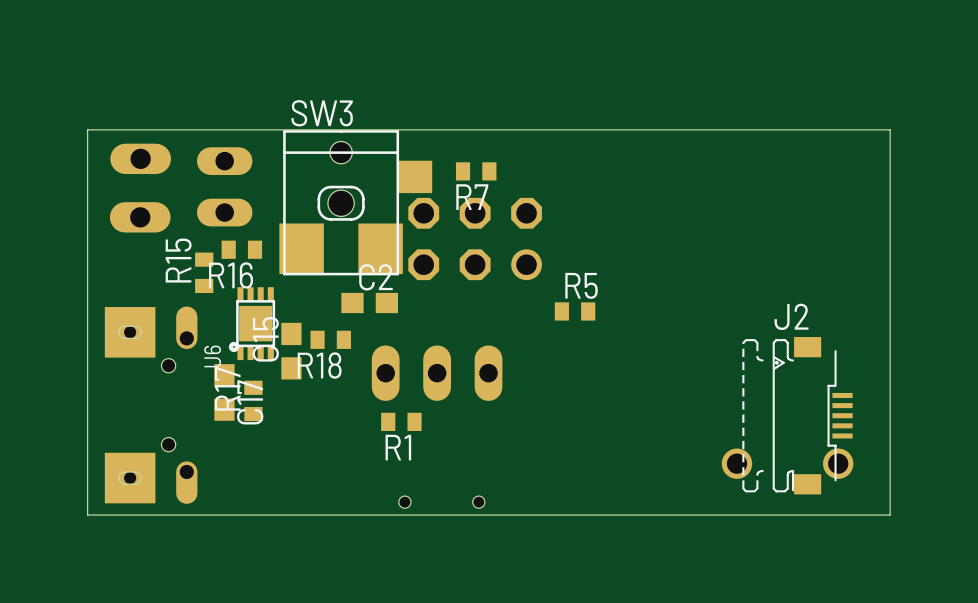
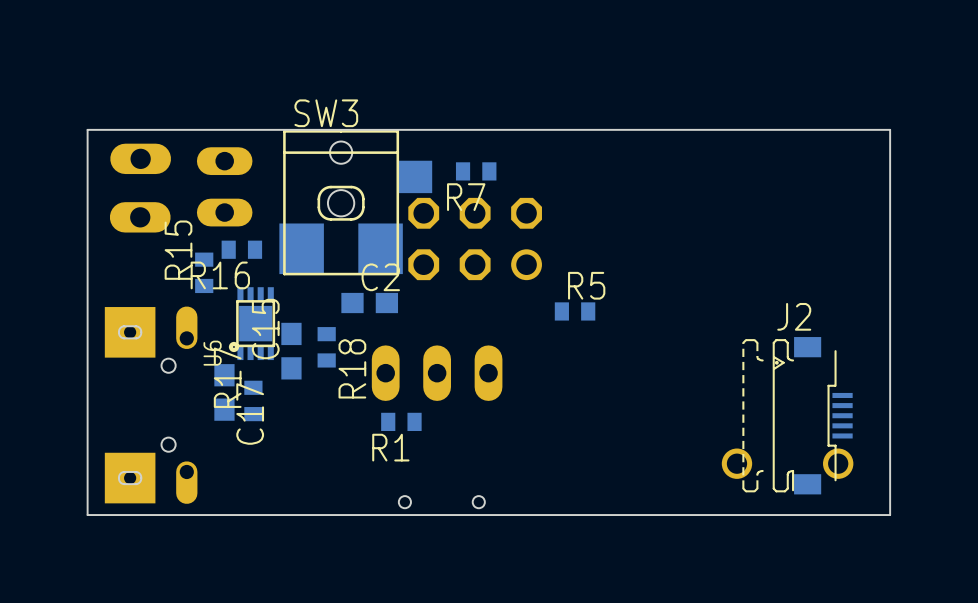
R18 rotation: 0° (330, 339) -> 90° clockwise (326, 347)
R18 name position: R18 (319, 365) -> R18 (352, 368)

